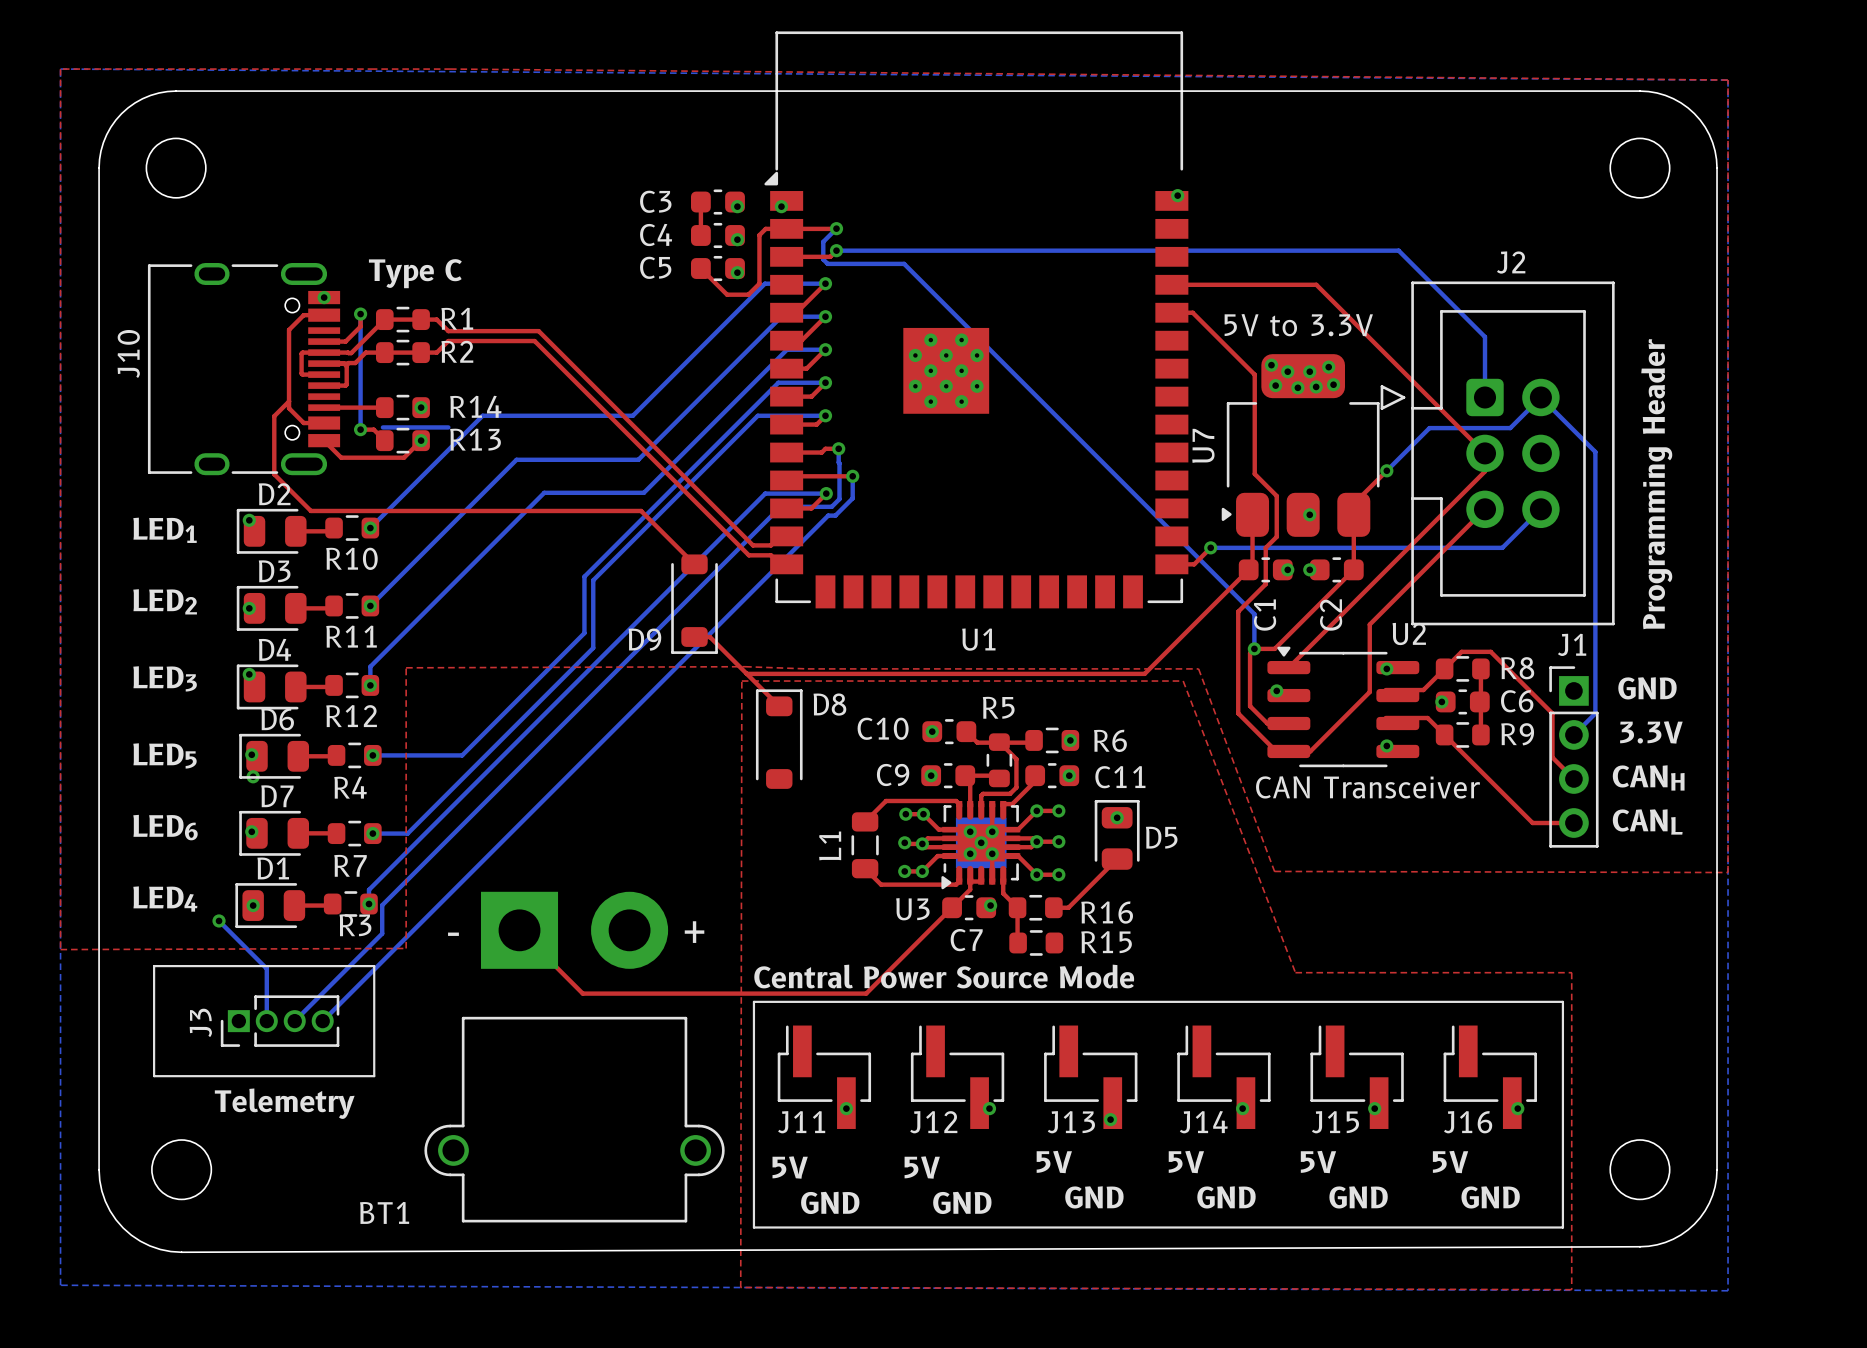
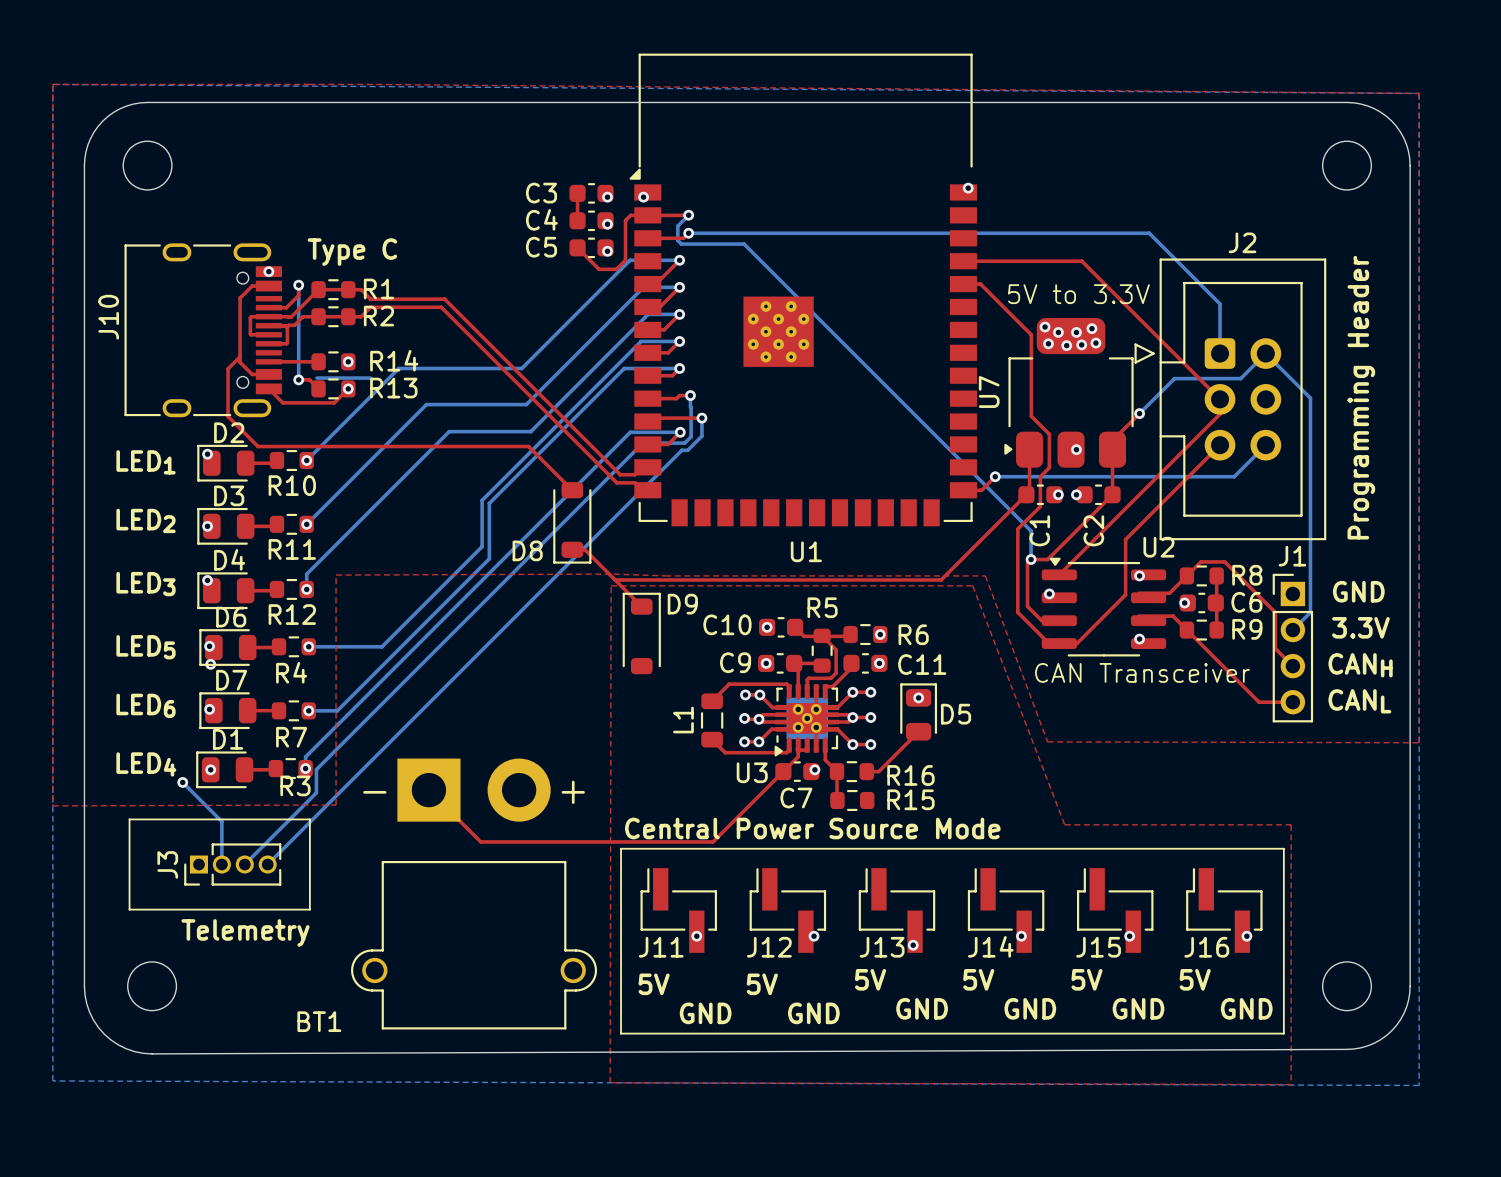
D9 name: D9 (644, 639) -> D8 (527, 550)
D8 name: D8 (829, 704) -> D9 (682, 604)

